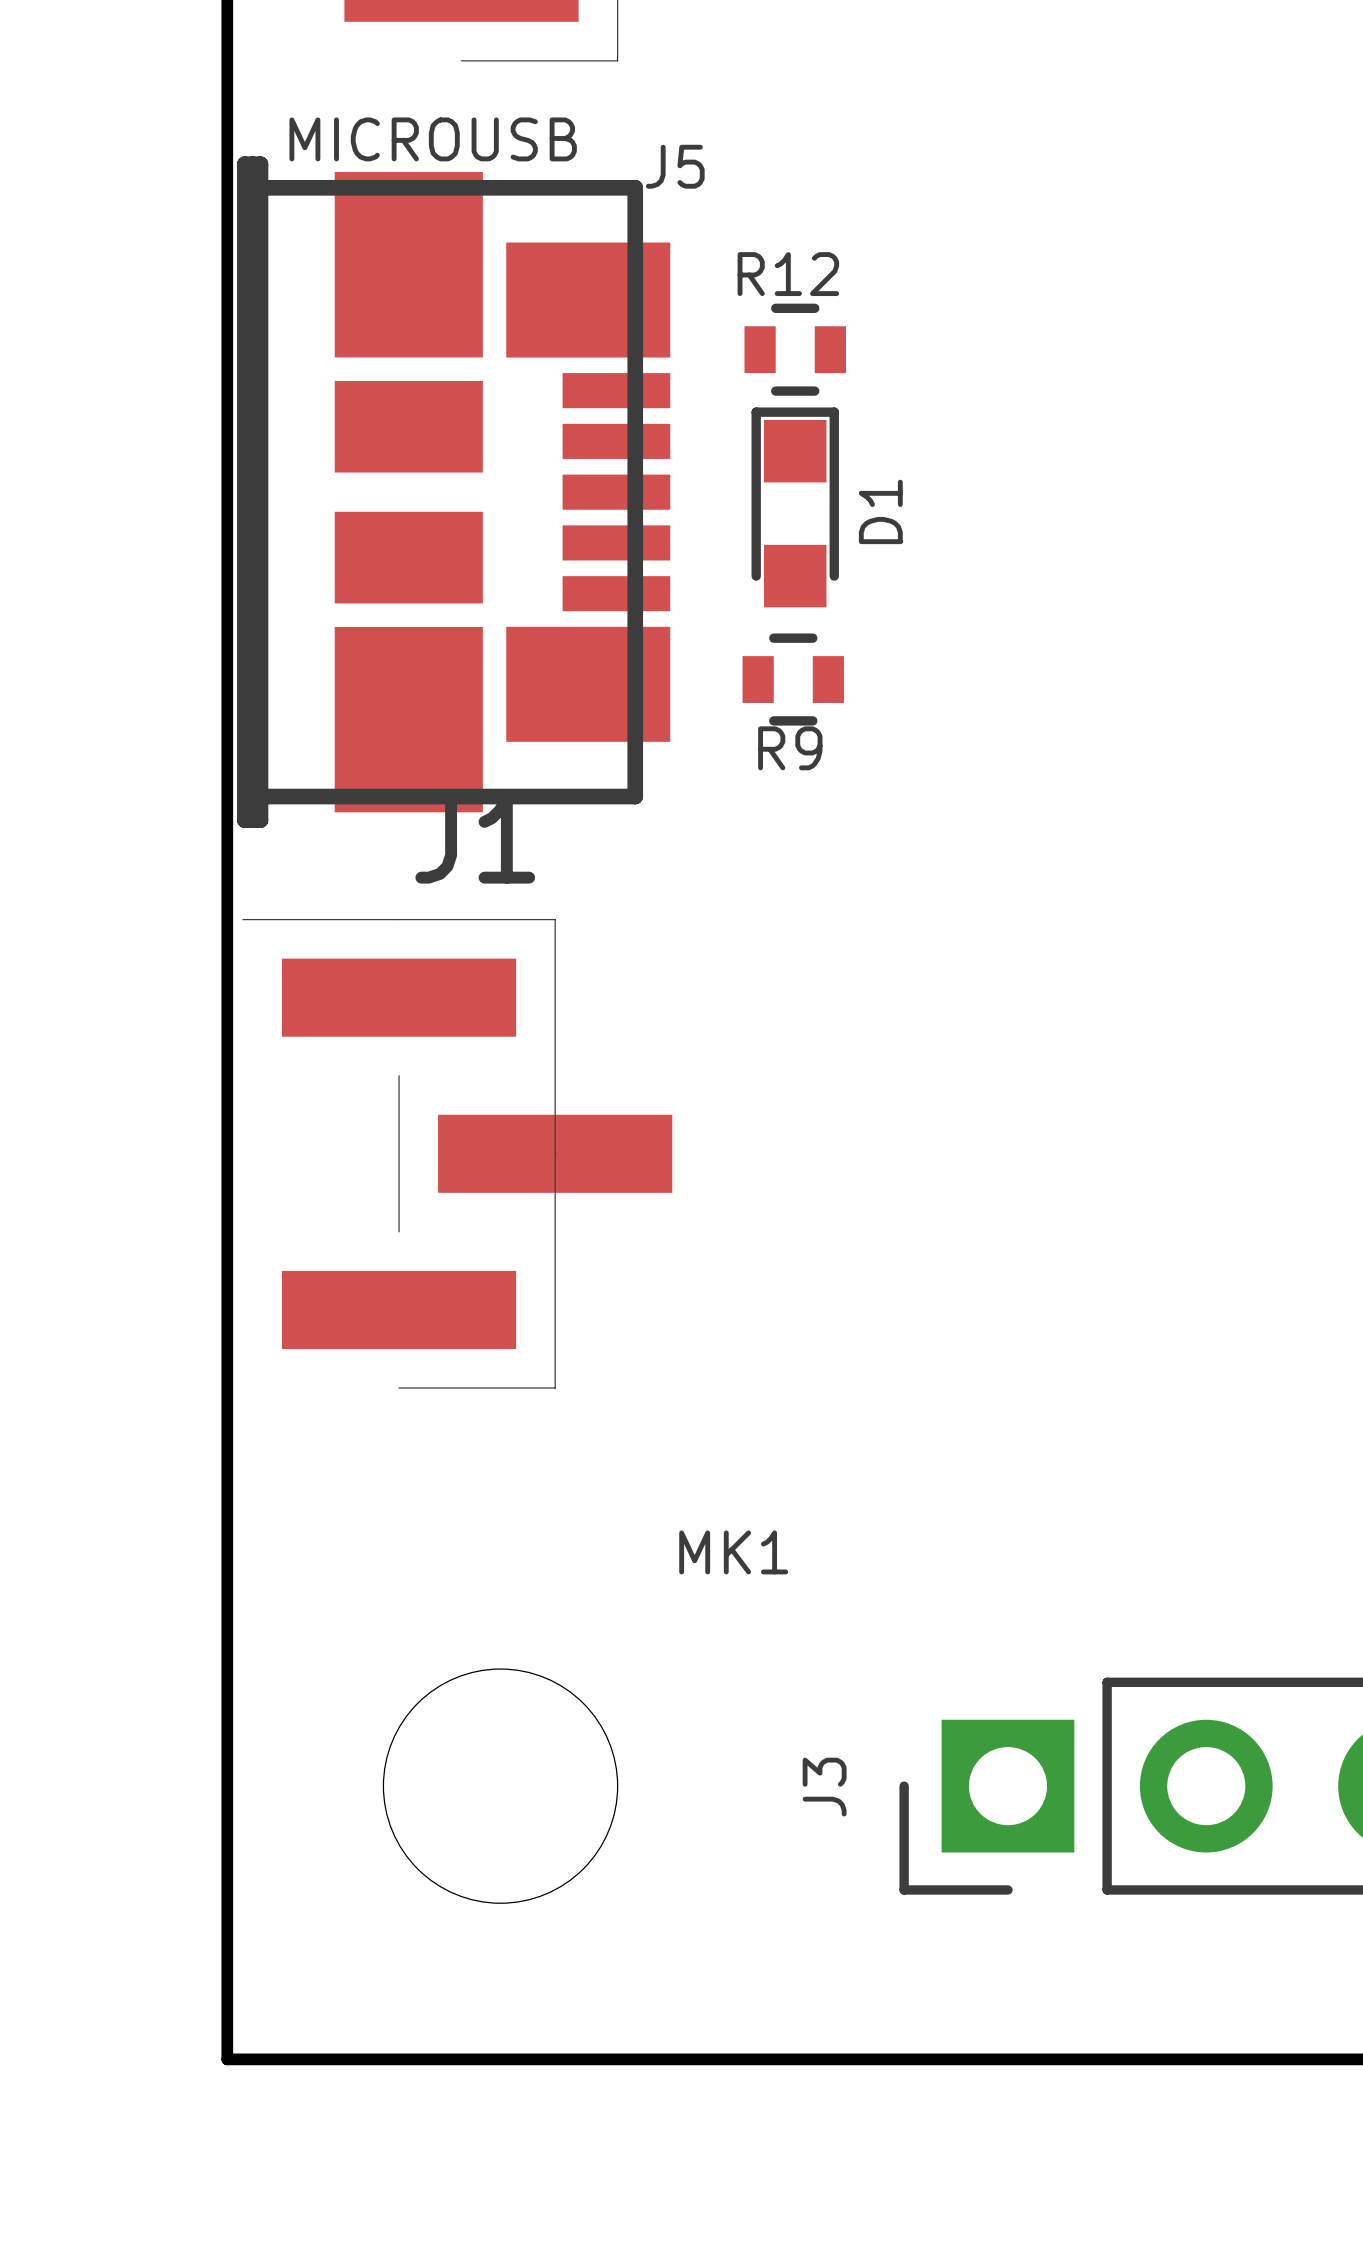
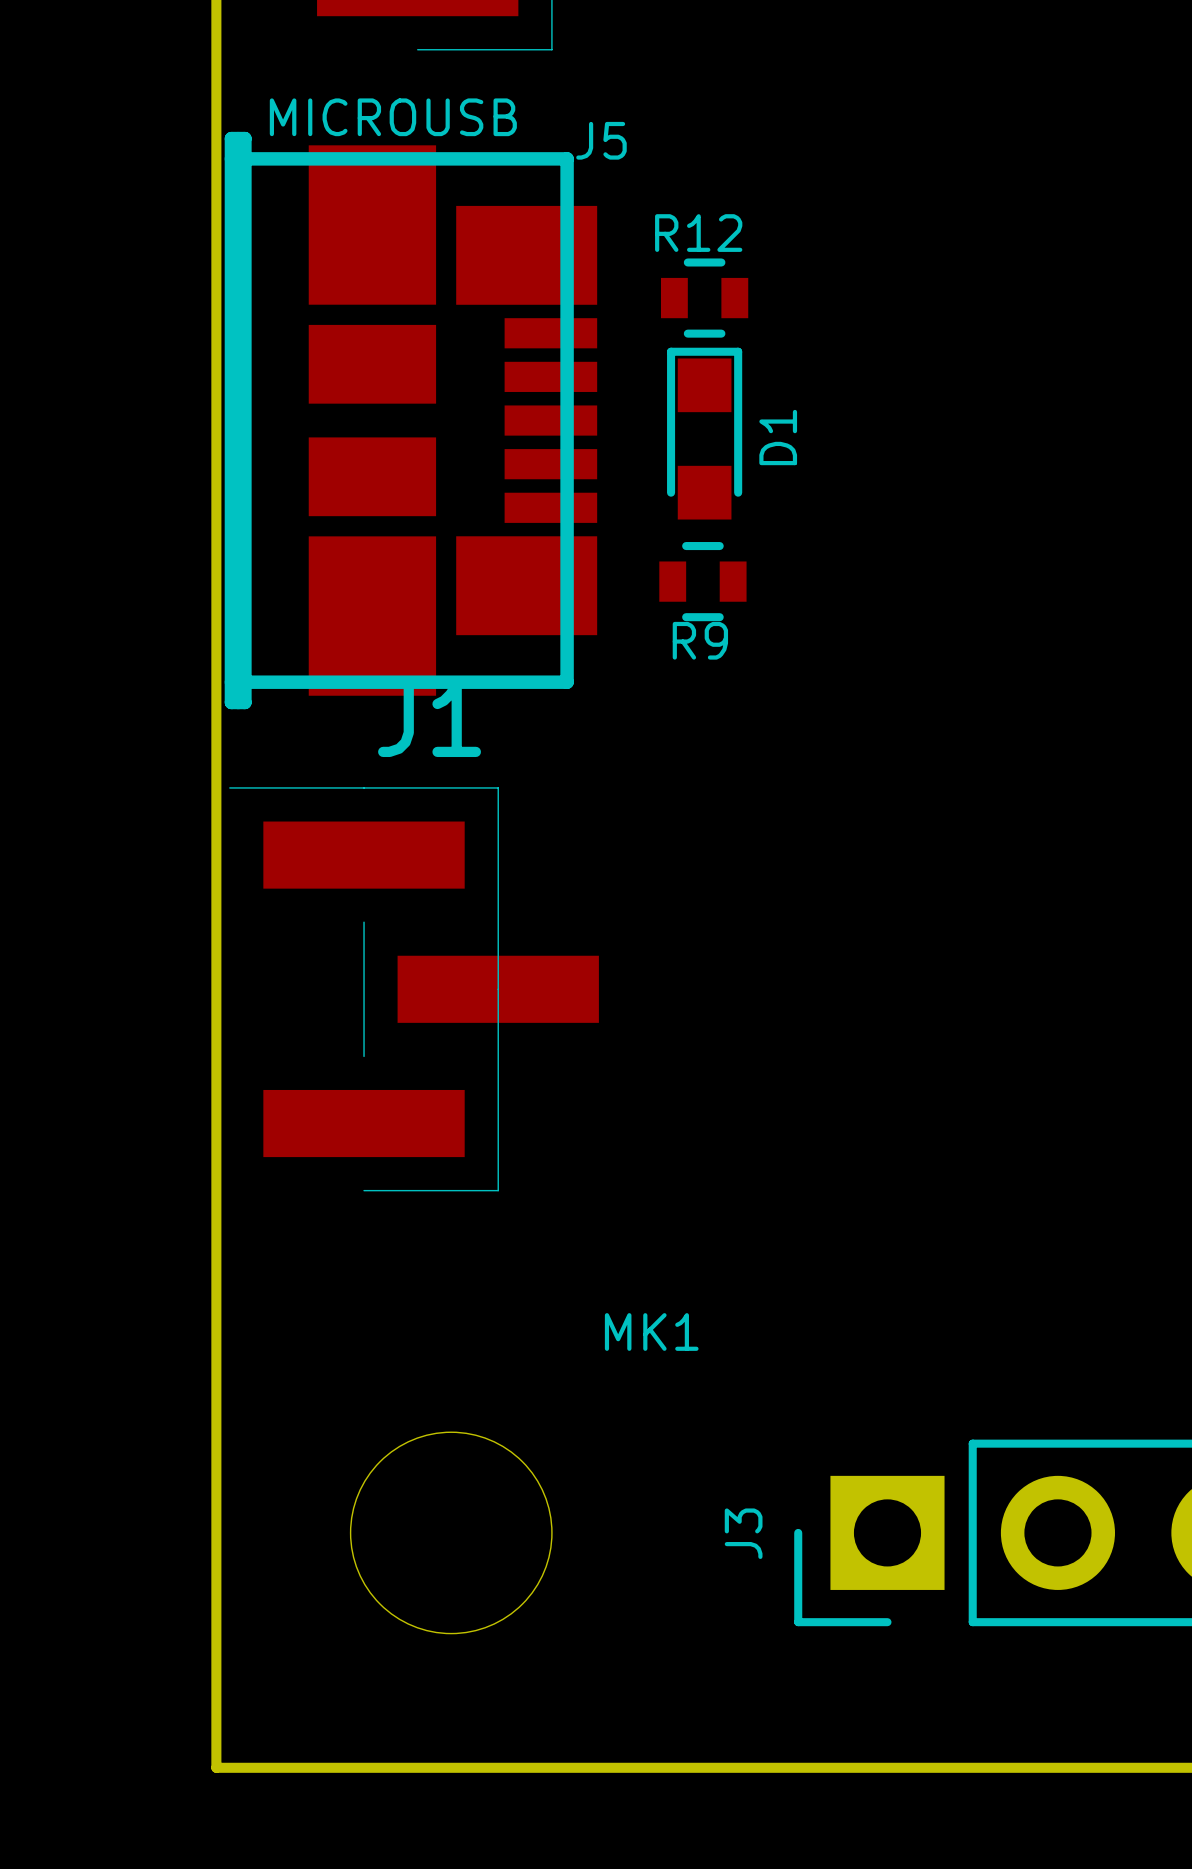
J3 name position: J3 (824, 1787) -> J3 (743, 1533)

